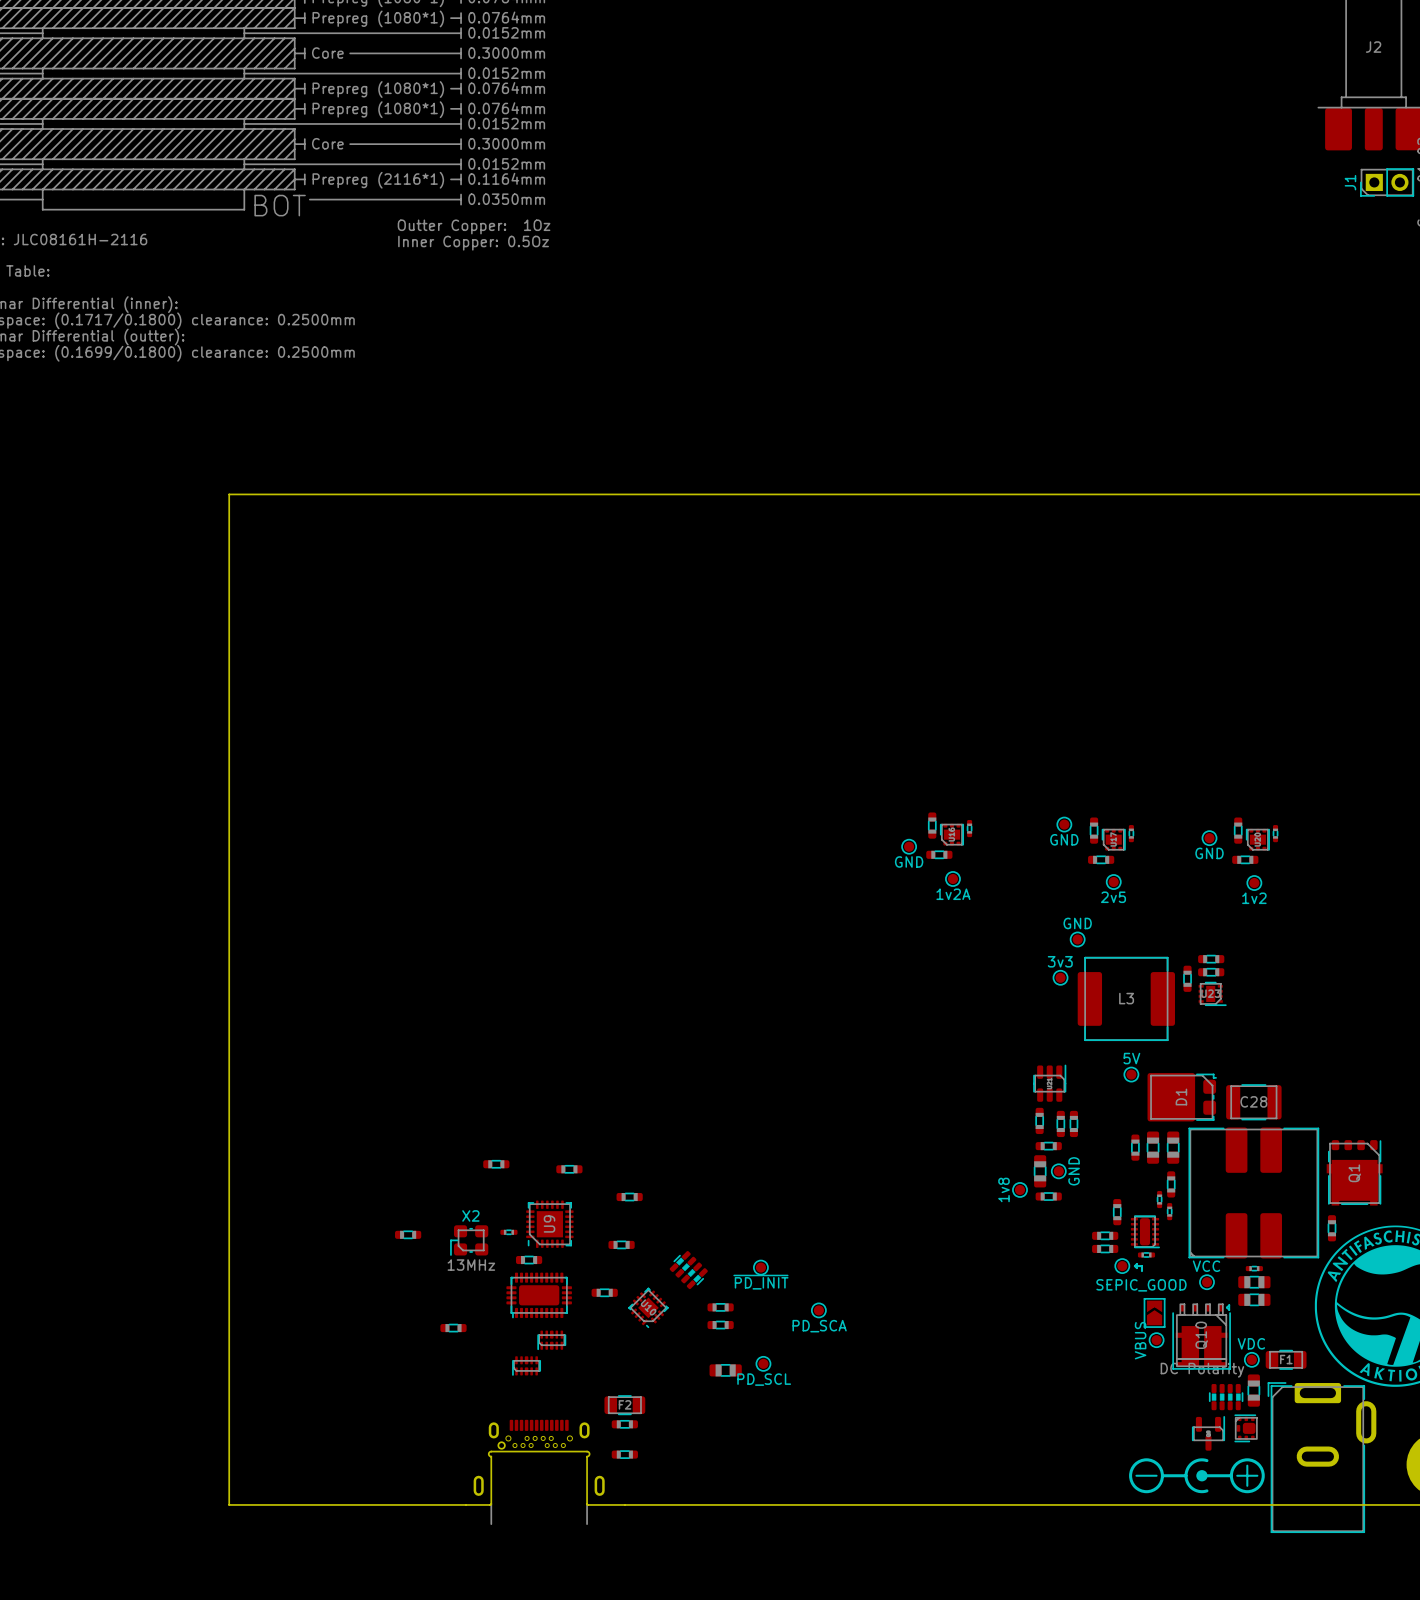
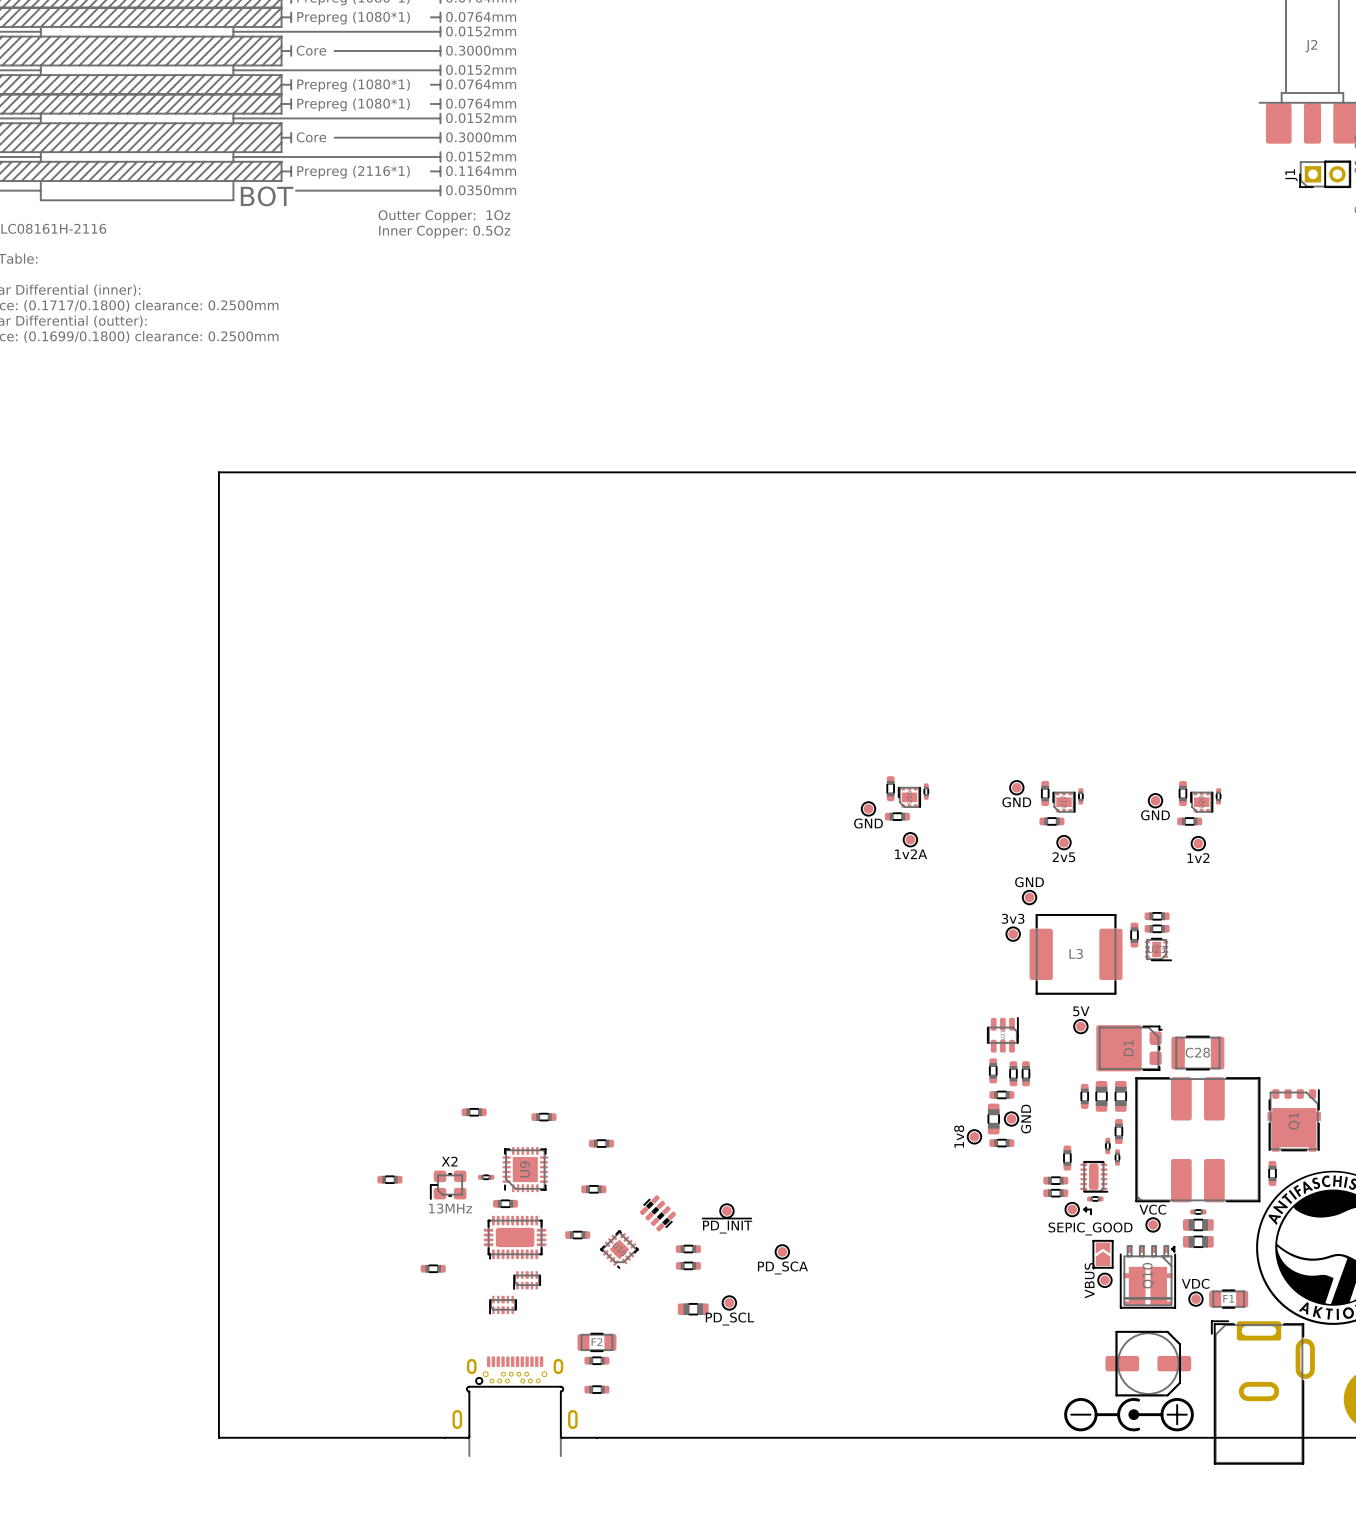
part: (1253, 1390) -> none
part: (1226, 1397) -> none
part: none -> (1148, 1363)
part: (1245, 1428) -> none
part: (1208, 1433) -> none
drawing: [1129, 1458, 1265, 1494] -> none
drawing: none -> [1064, 1397, 1194, 1432]

